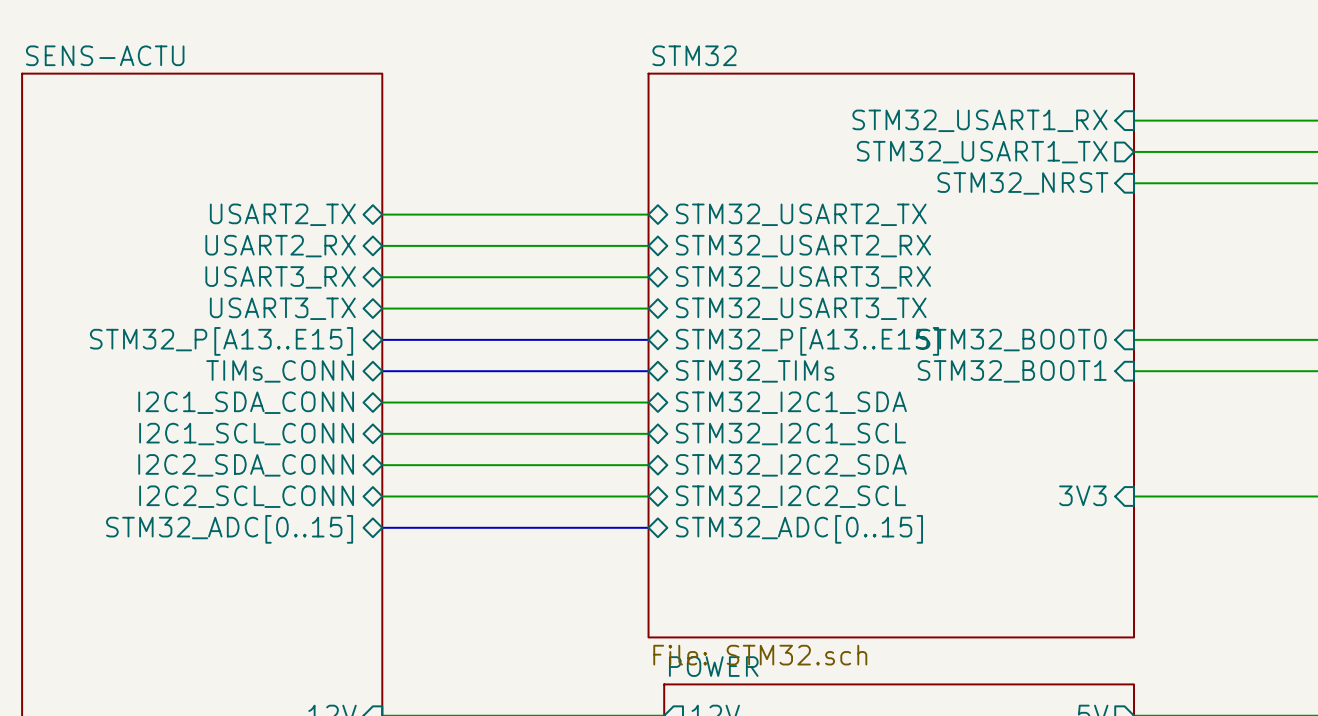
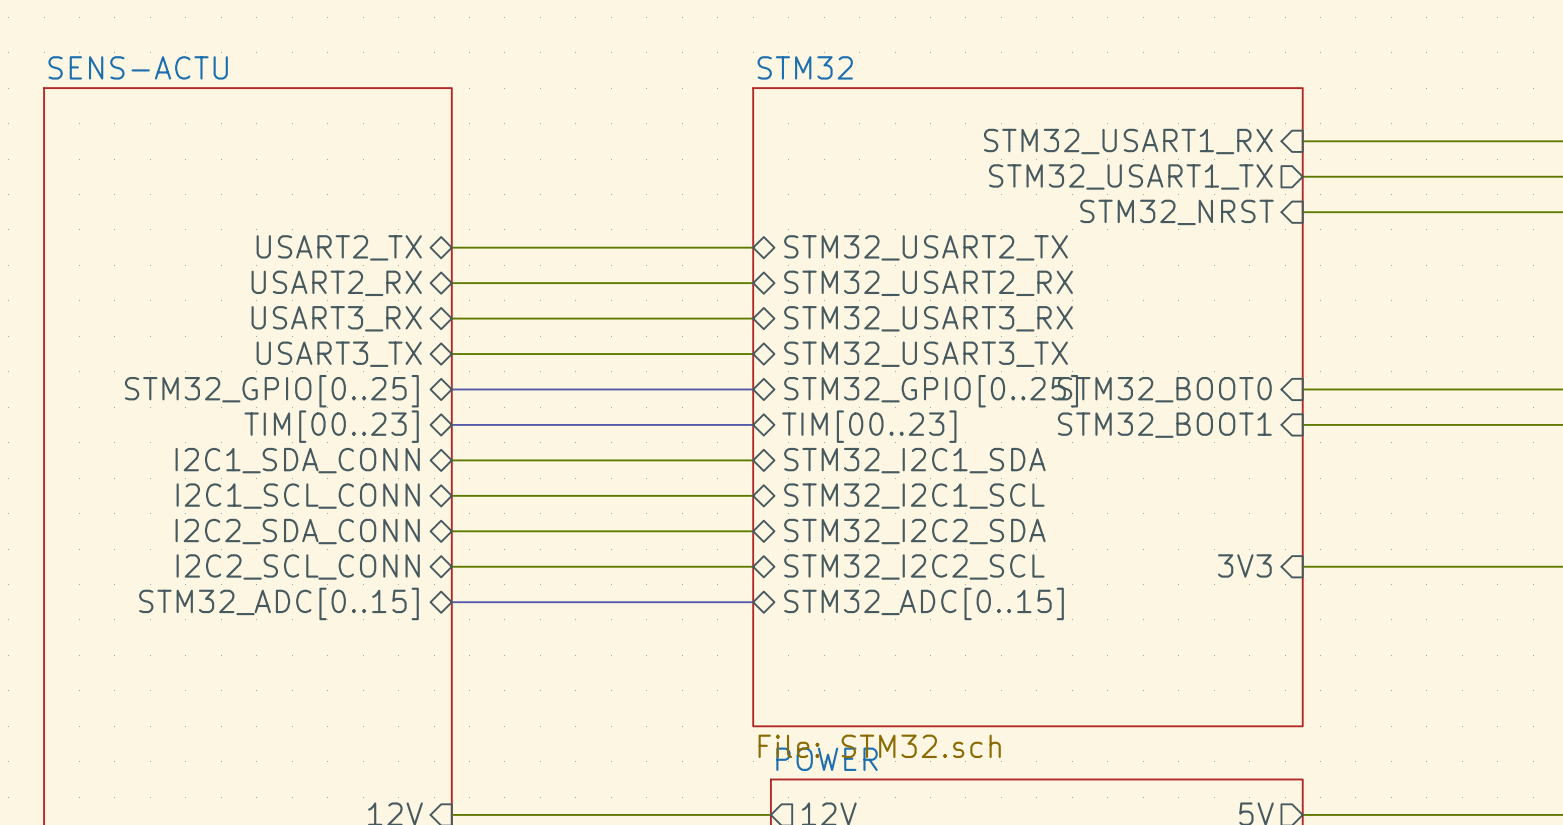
sheet pin: STM32_P[A13..E15] (221, 341) -> STM32_GPIO[0..25] (271, 391)
sheet pin: STM32_P[A13..E15] (807, 341) -> STM32_GPIO[0..25] (931, 391)
sheet pin: TIMs_CONN (280, 371) -> TIM[00..23] (331, 426)
sheet pin: STM32_TIMs (755, 371) -> TIM[00..23] (869, 426)

